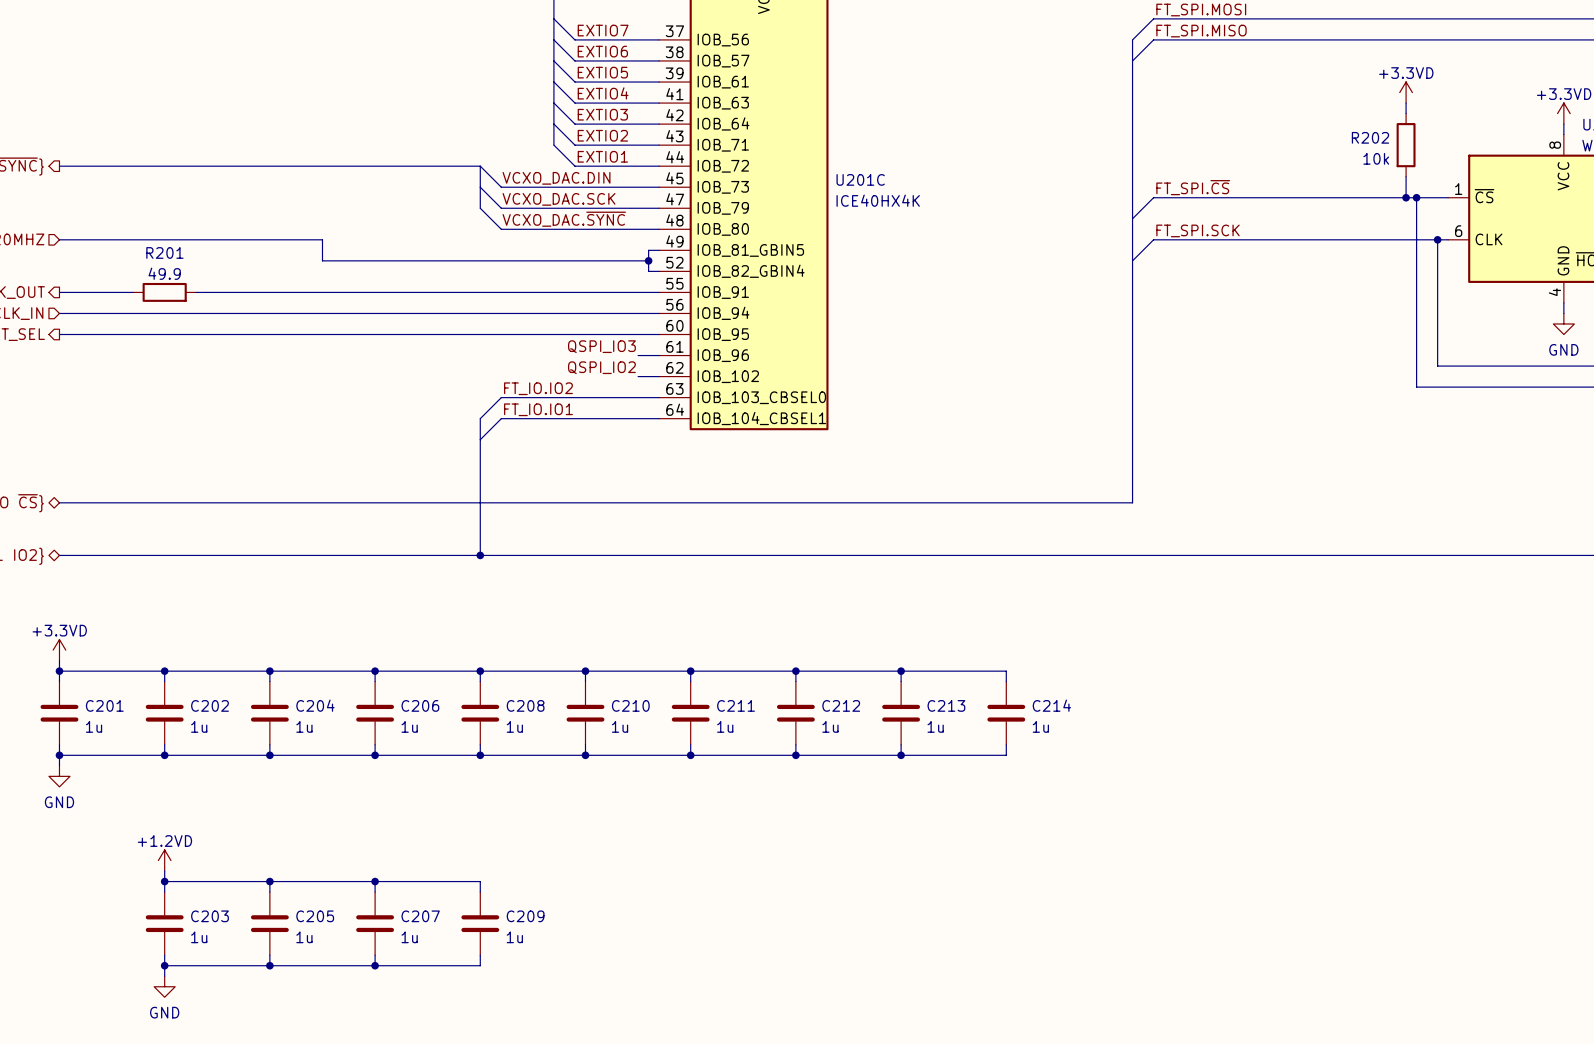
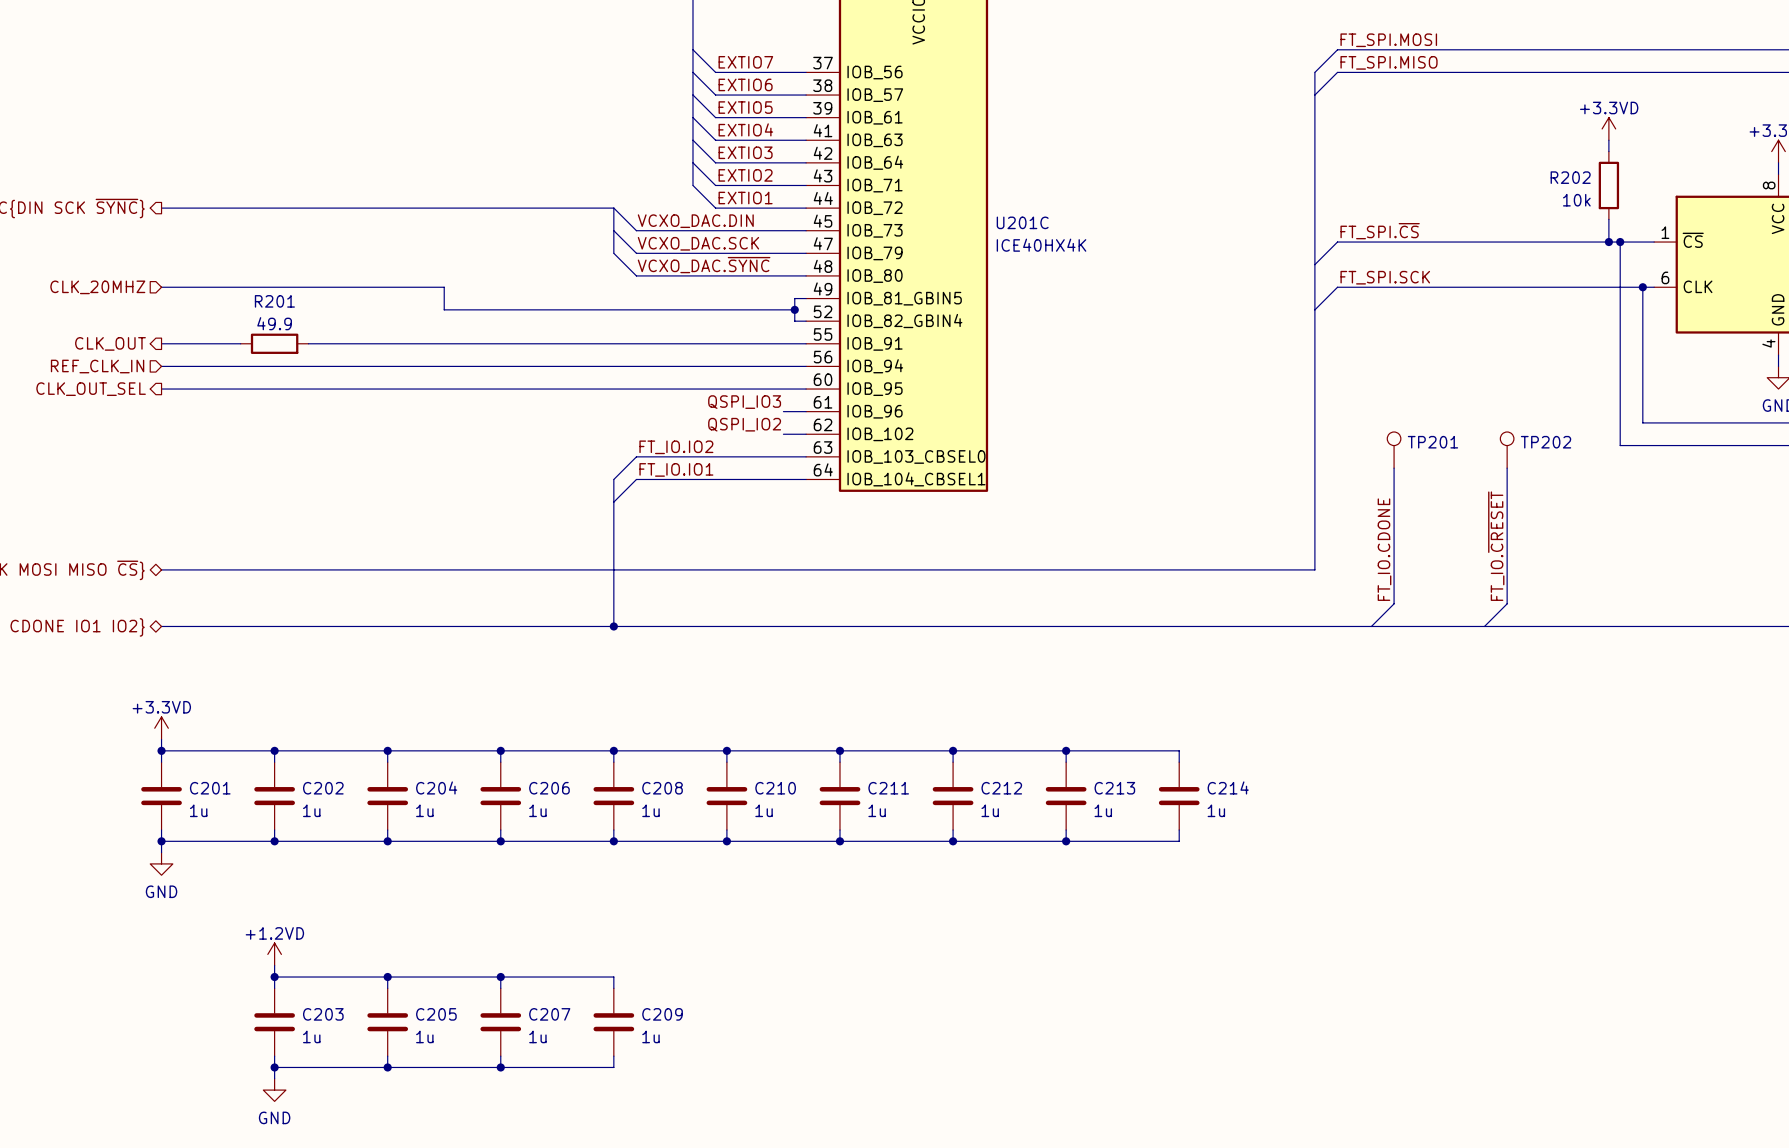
TP201: none -> (1394, 450)
TP202: none -> (1507, 450)
wire: none -> (1394, 468) (1394, 603) (1371, 626)
wire: none -> (1507, 468) (1507, 603) (1484, 626)
label: none -> FT_IO.~{CRESET} (1496, 546)
label: none -> FT_IO.CDONE (1384, 549)

